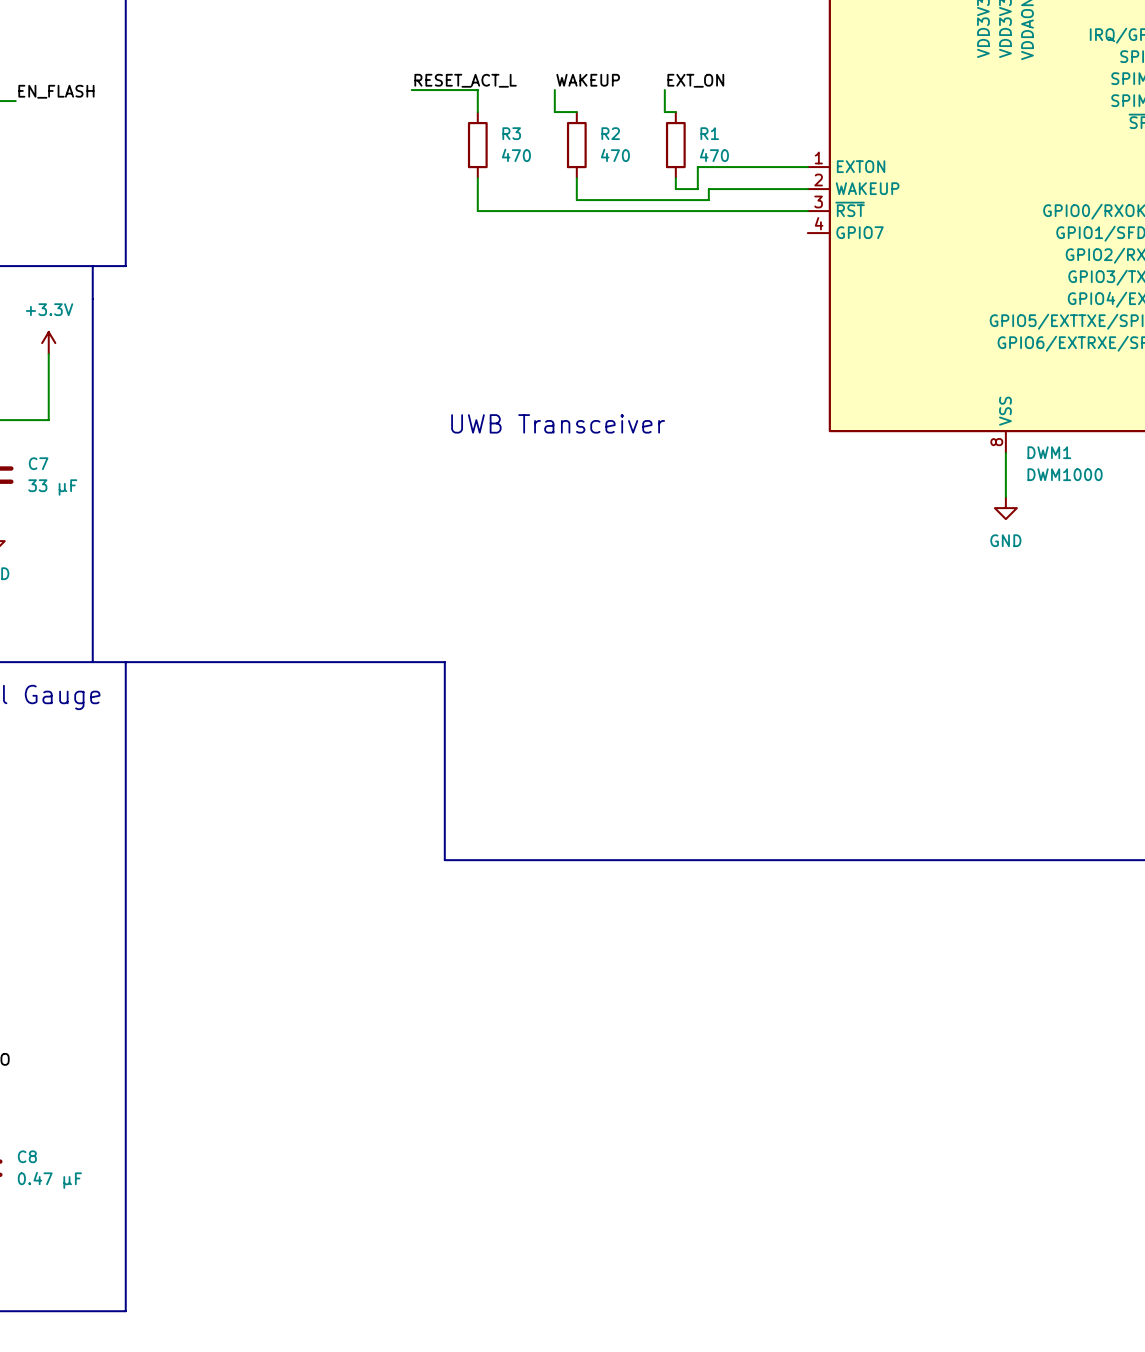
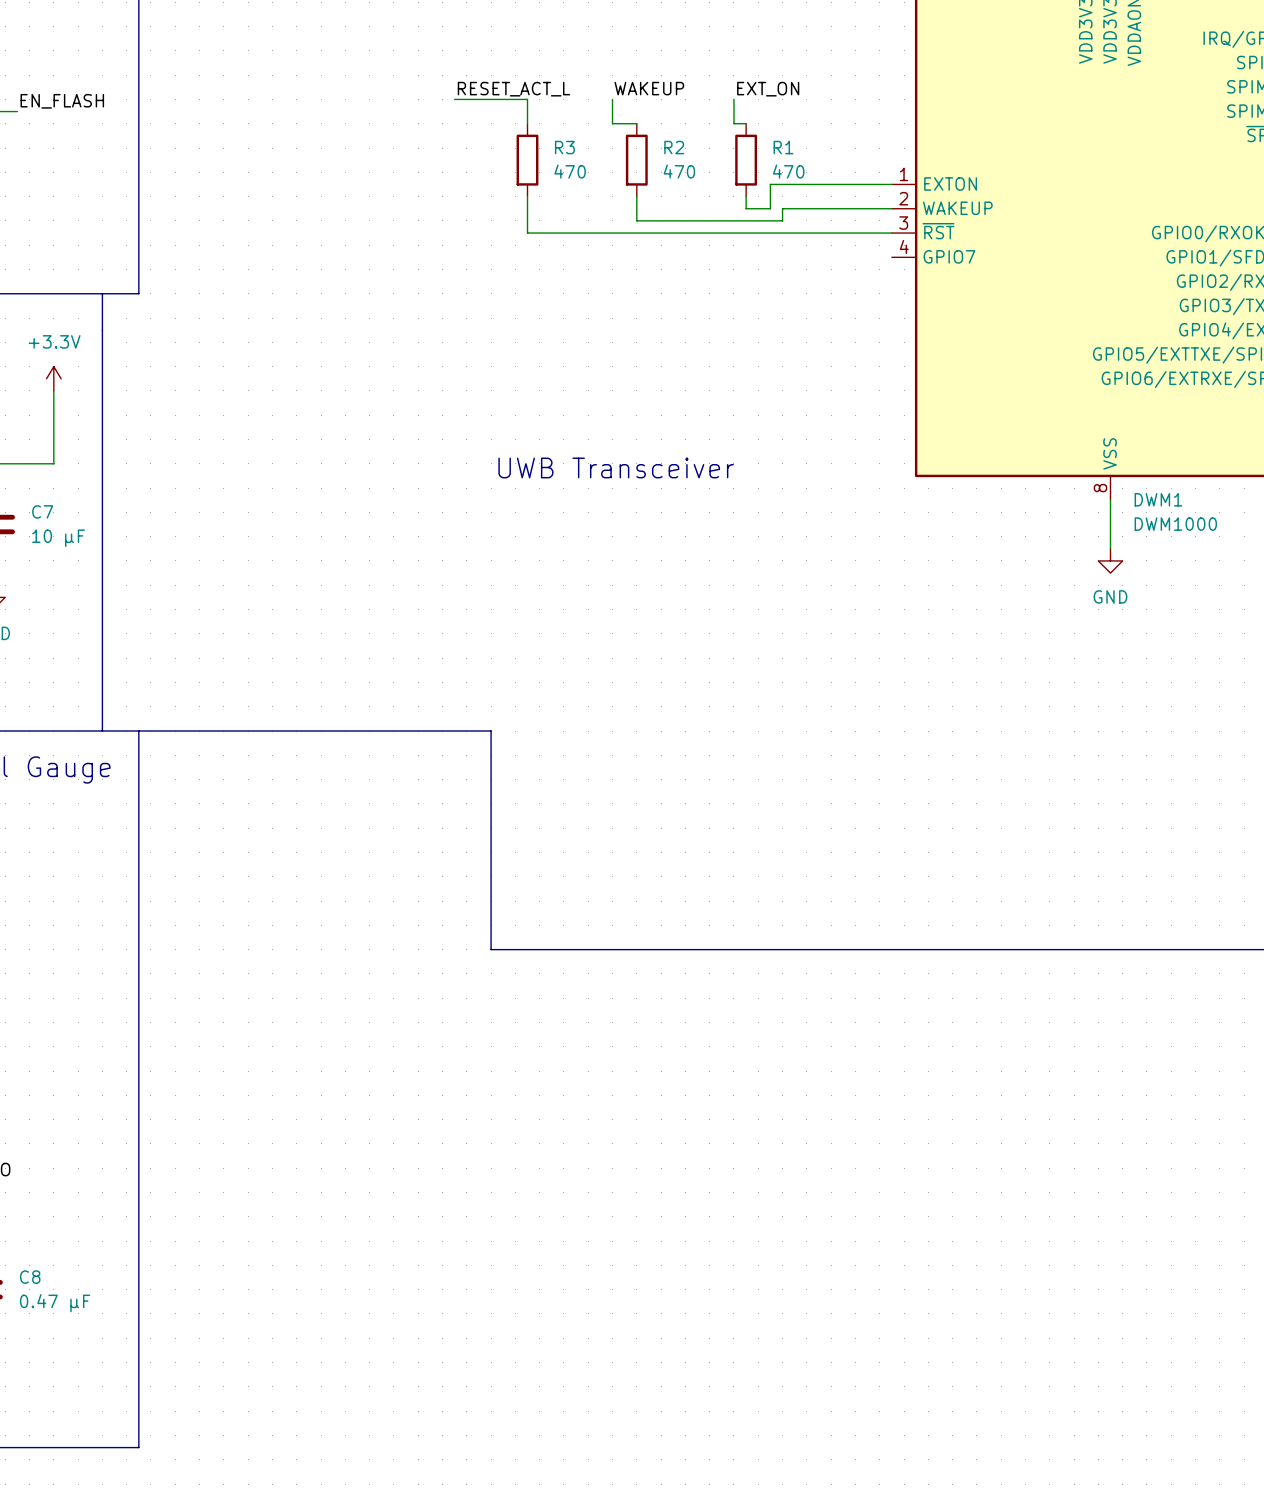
C7 value: 33 μF (52, 487) -> 10 μF (58, 538)

